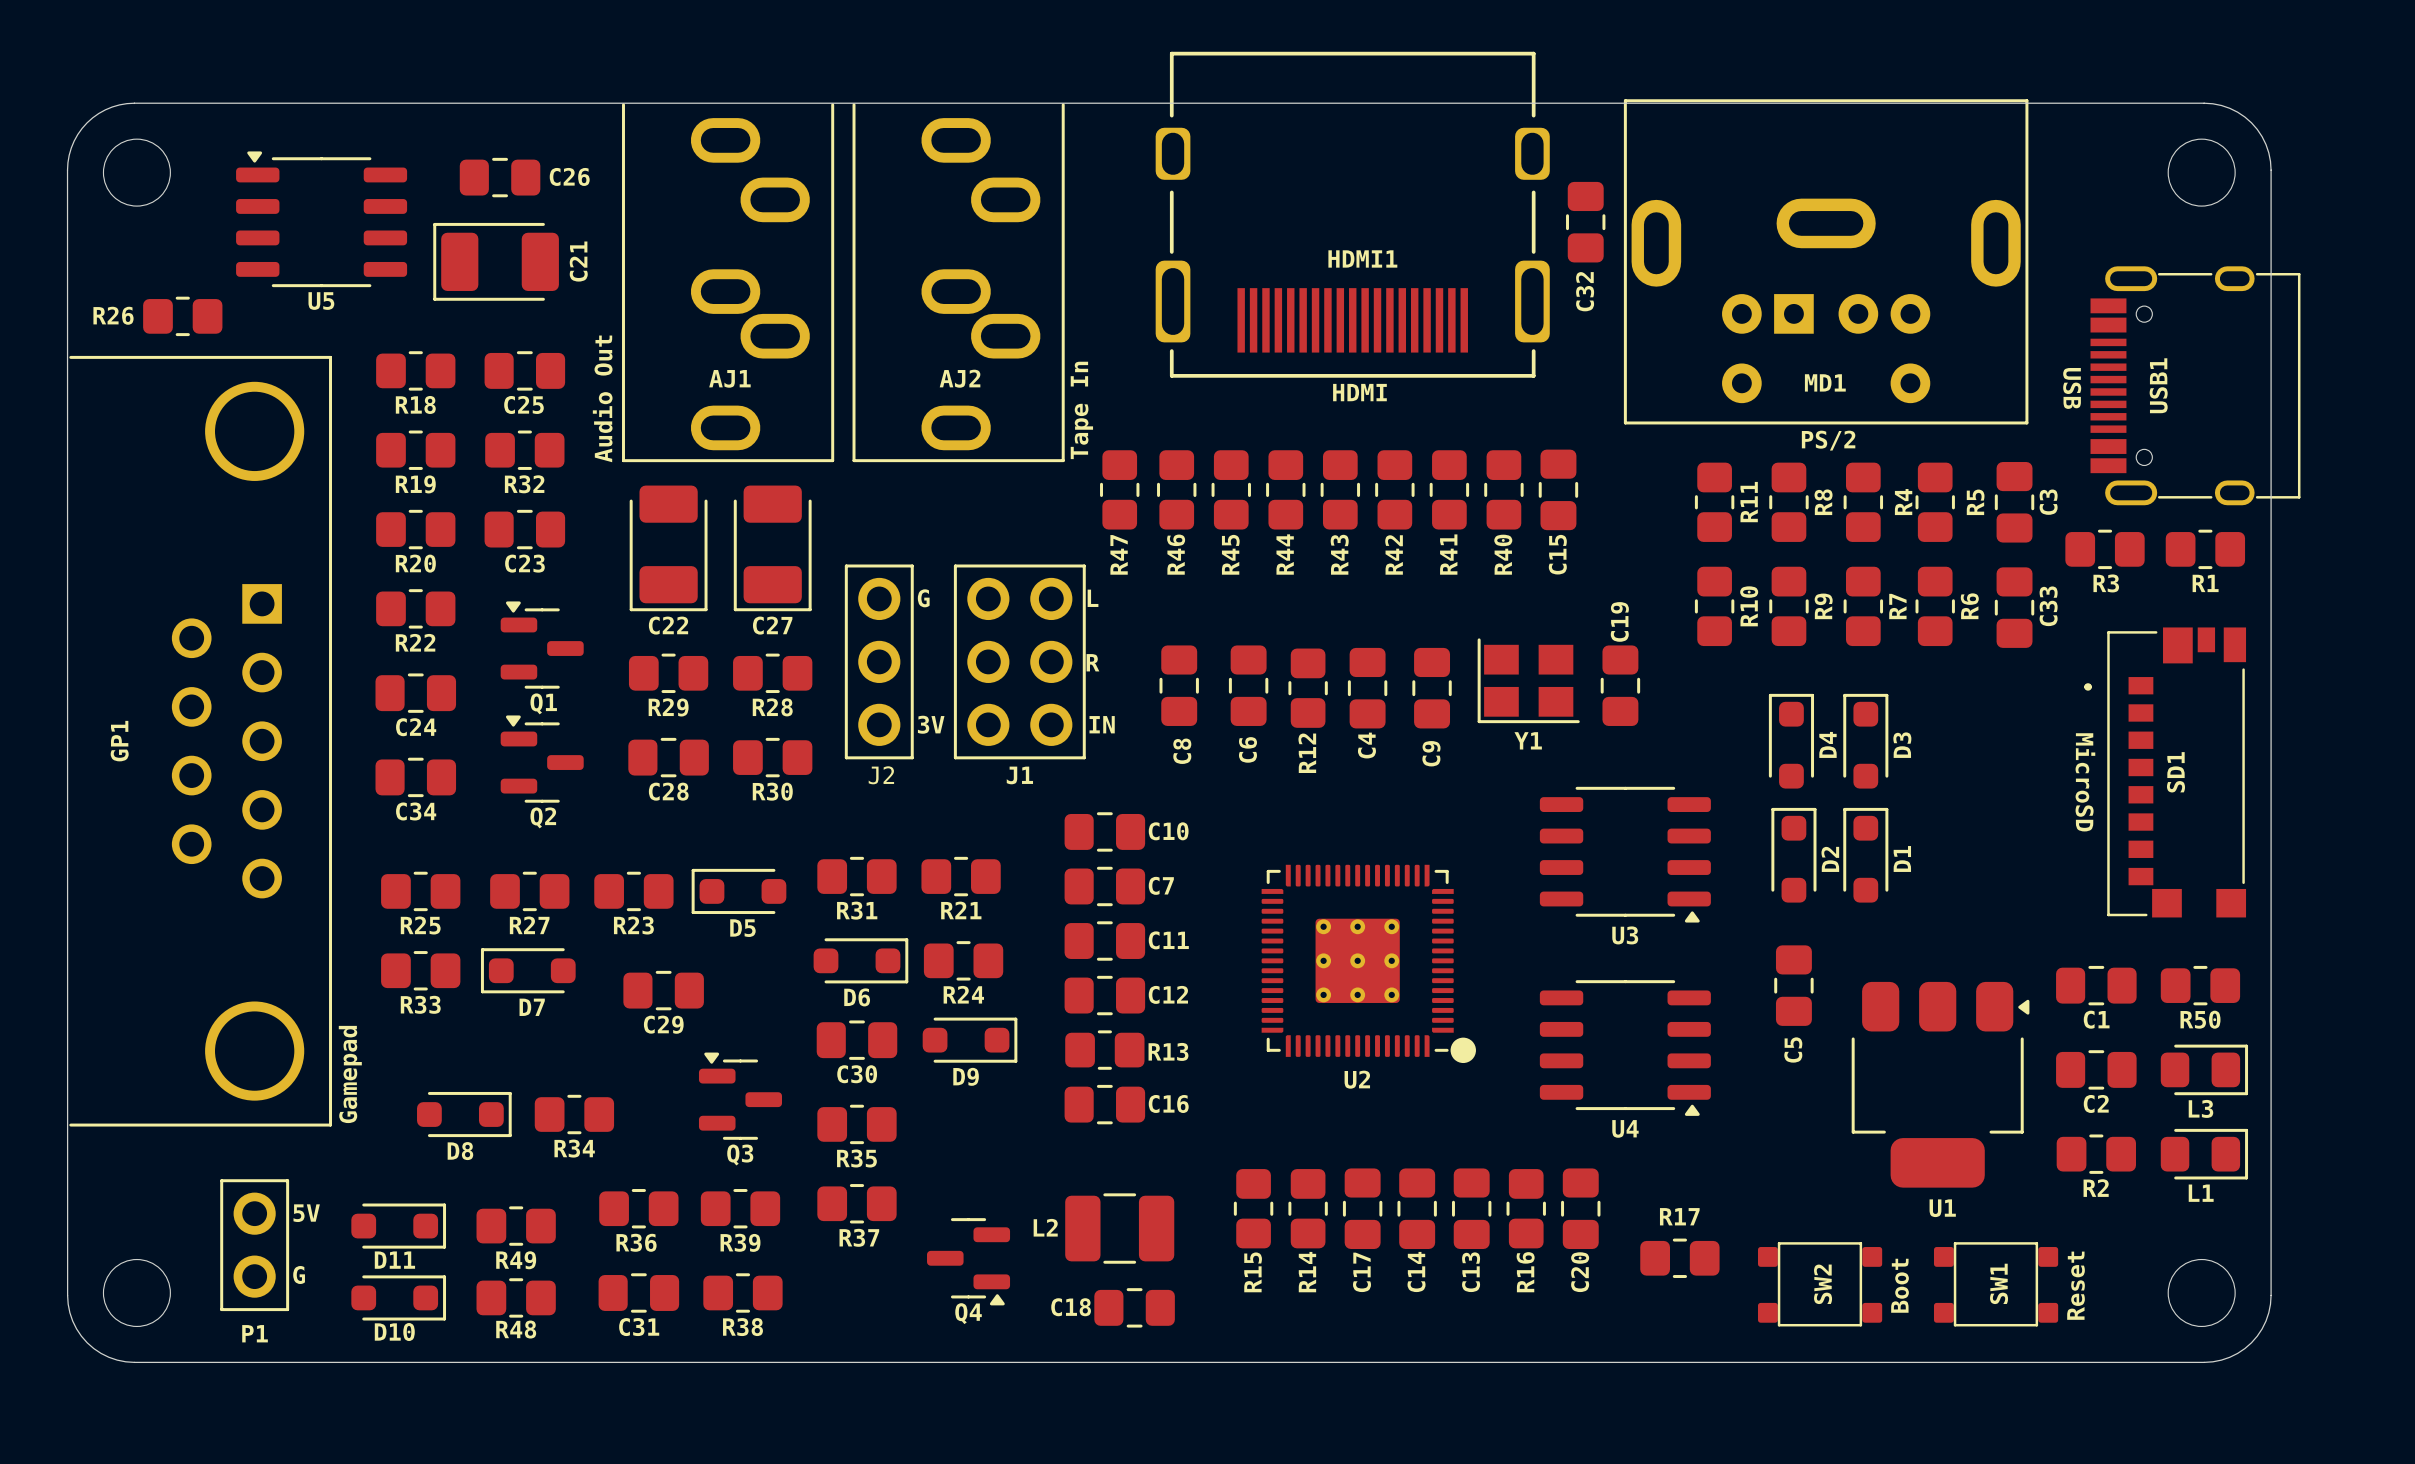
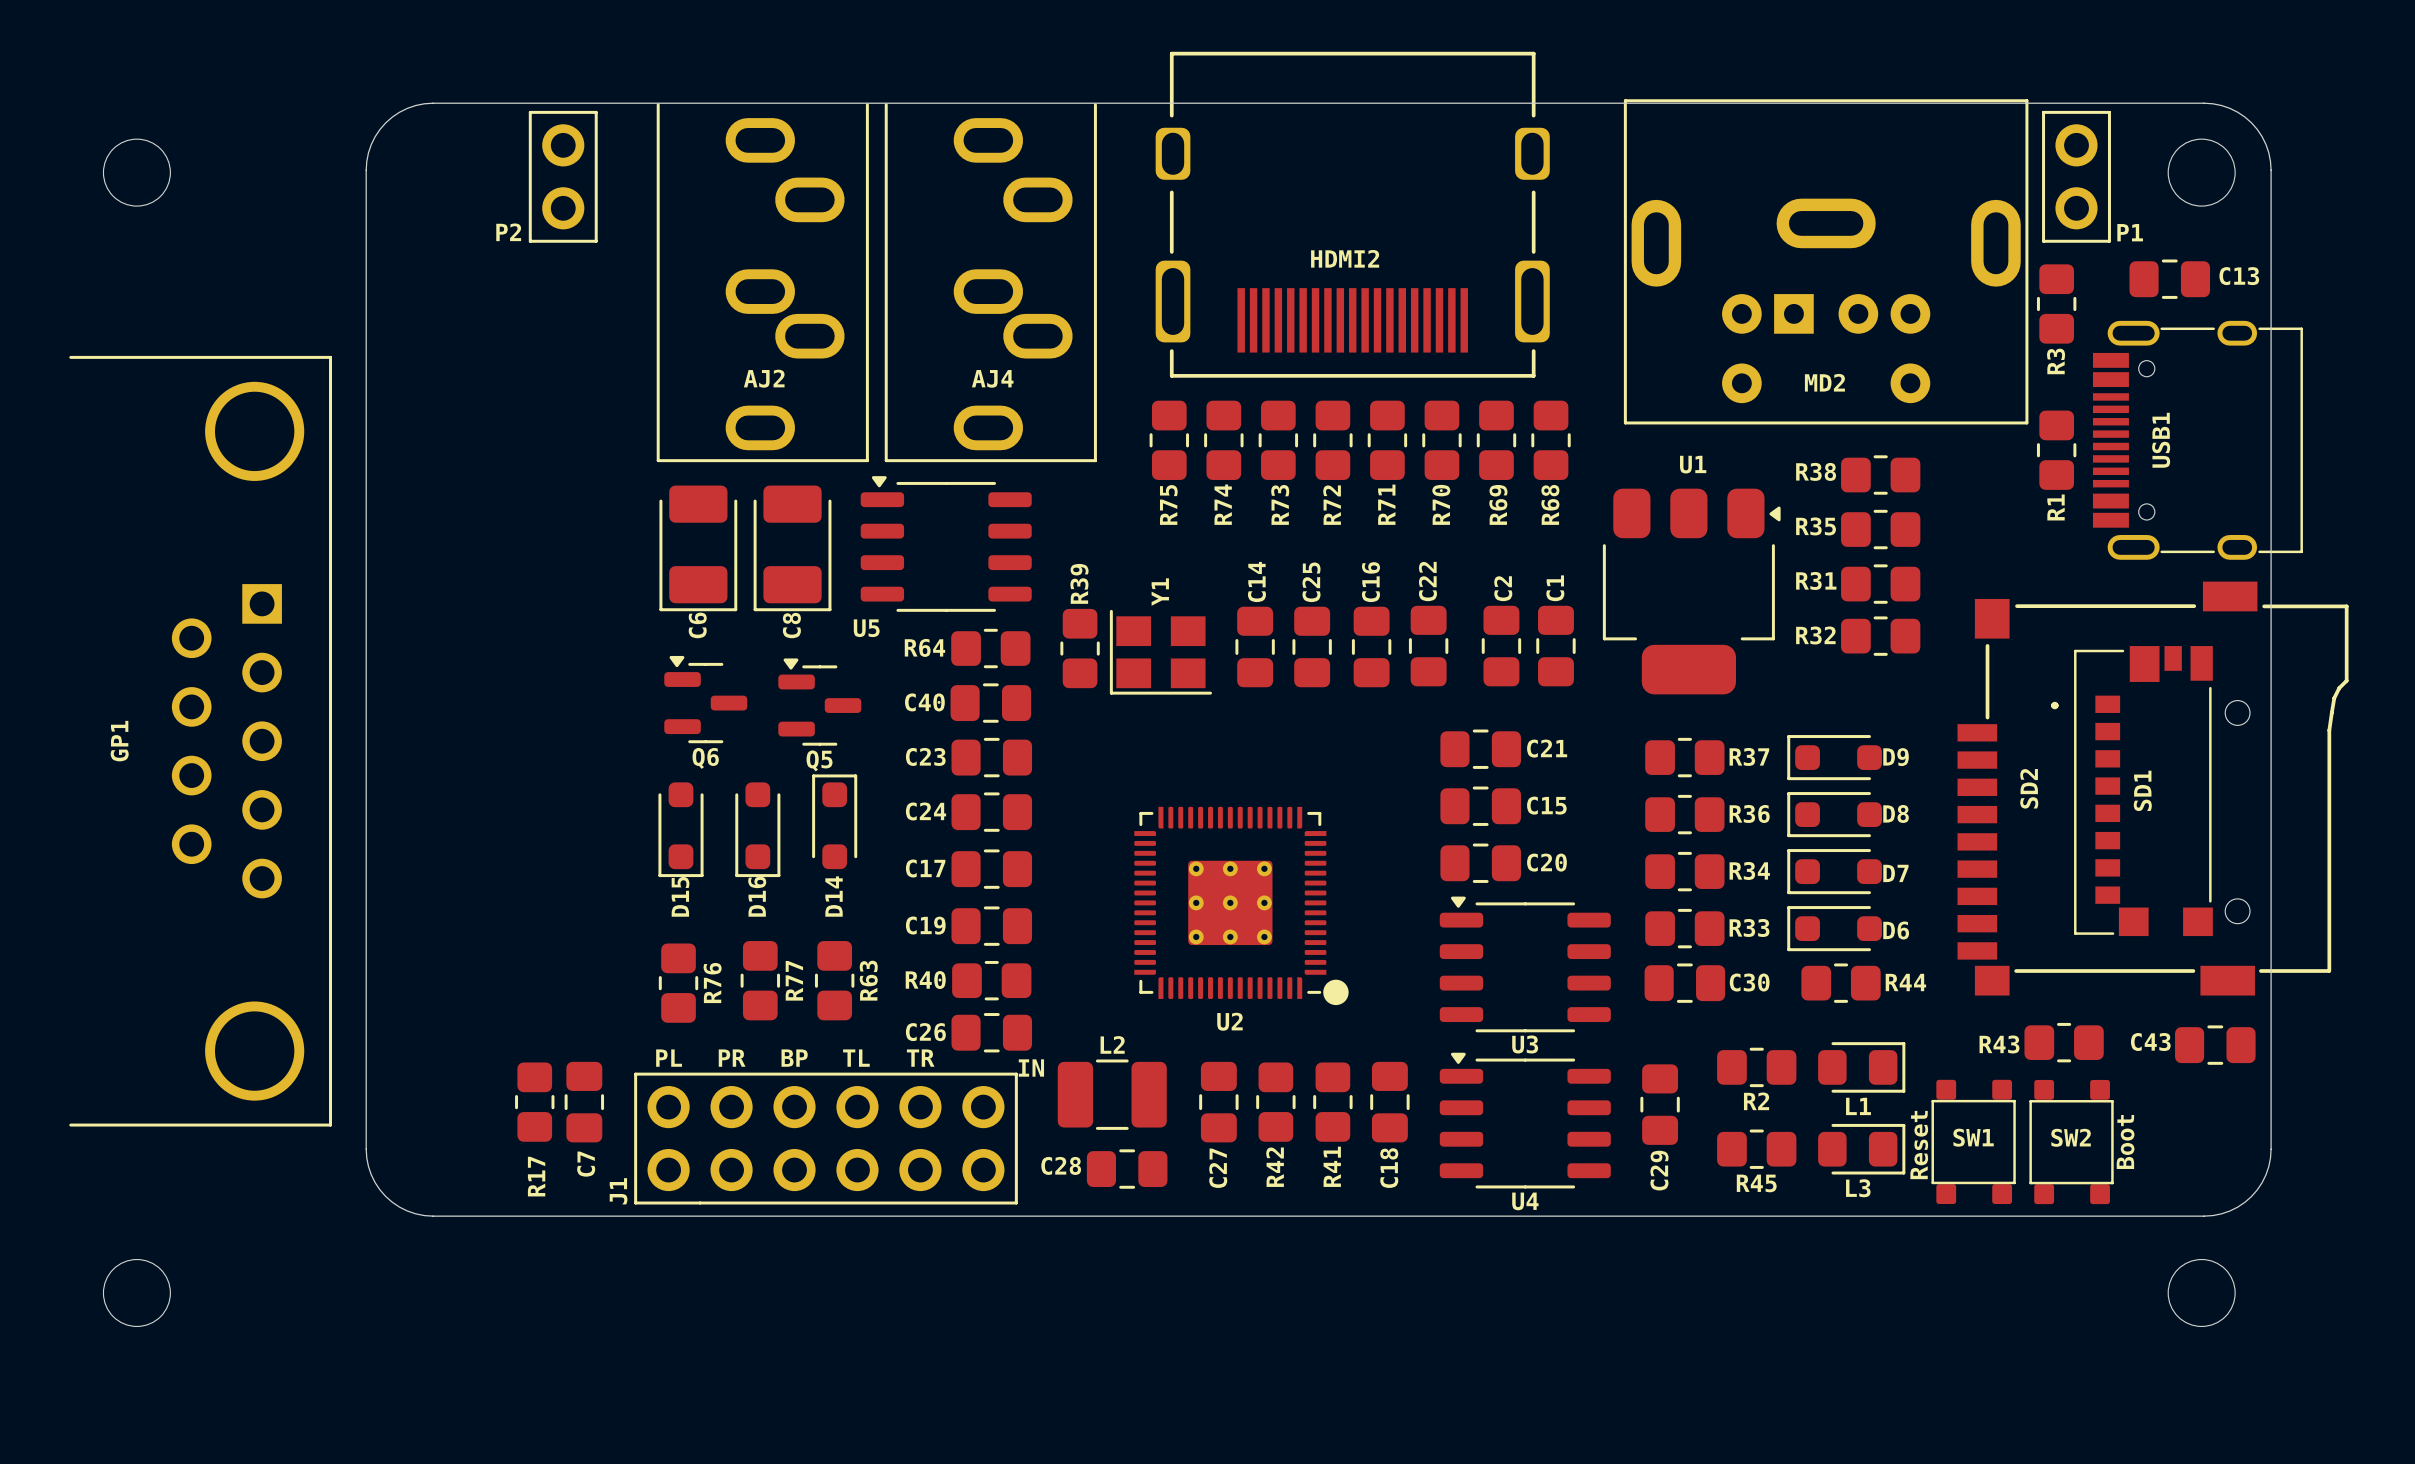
board edge: (433, 103) (126, 103) (105, 109) (87, 122) (74, 141) (69, 155) (67, 170) (67, 1295) (69, 1312) (76, 1328) (87, 1342) (101, 1353) (117, 1360) (134, 1362) (2212, 1361) (2229, 1357) (2251, 1342) (2262, 1328) (2268, 1312) (2271, 1295) (2271, 1149) -> (433, 103) (407, 108) (385, 122) (371, 144) (366, 170) (366, 1149) (368, 1166) (375, 1182) (385, 1196) (399, 1207) (415, 1213) (433, 1216) (2204, 1216) (2229, 1211) (2251, 1196) (2265, 1174) (2271, 1149)
P2: none -> (563, 176)
C26 name position: C26 (569, 176) -> C26 (925, 1032)
C26 position: (500, 177) -> (991, 1032)
U5 position: (321, 219) -> (946, 543)
C21 footprint: [433, 222, 559, 301] -> [1440, 729, 1521, 769]
C32: (1585, 222) -> none
HDMI1 name: HDMI1 (1362, 258) -> HDMI2 (1345, 258)
AJ1: (728, 282) -> none
AJ2 position: (958, 282) -> (762, 282)
AJ4: none -> (990, 282)
U5 name position: U5 (321, 301) -> U5 (866, 628)
R26: (182, 316) -> none
R18: (415, 370) -> none
C25 rotation: 0° (524, 370) -> 90° clockwise (1312, 646)
C25 position: (524, 370) -> (1312, 646)
MD1 name: MD1 (1825, 382) -> MD2 (1824, 382)
USB1 position: (2195, 385) -> (2197, 440)
text: USB (2072, 388) -> none
text: HDMI (1359, 392) -> none
text: Audio Out (602, 398) -> none
C25 name position: C25 (523, 404) -> C25 (1311, 582)
text: Tape In (1081, 410) -> none
R75: none -> (1169, 440)
R74: none -> (1223, 440)
R73: none -> (1278, 440)
R72: none -> (1332, 440)
R71: none -> (1387, 440)
R70: none -> (1441, 440)
R69: none -> (1496, 440)
R68: none -> (1551, 440)
text: PS/2 (1828, 440) -> none
R19: (415, 450) -> none
R32 position: (524, 450) -> (1880, 636)
R32 name position: R32 (524, 484) -> R32 (1815, 635)
C22 footprint: [629, 485, 708, 612] -> [1408, 605, 1449, 687]
C27 footprint: [733, 485, 812, 612] -> [1199, 1061, 1239, 1143]
R47: (1119, 489) -> none
R46: (1176, 489) -> none
R45 rotation: 0° (1231, 489) -> 90° clockwise (1756, 1149)
R45 position: (1231, 489) -> (1756, 1149)
R44 rotation: 0° (1285, 489) -> 90° clockwise (1841, 983)
R44 position: (1285, 489) -> (1841, 983)
R43 rotation: 0° (1340, 489) -> 90° clockwise (2064, 1042)
R43 position: (1340, 489) -> (2064, 1042)
R42 position: (1394, 489) -> (1275, 1102)
R41 position: (1449, 489) -> (1332, 1102)
R40 rotation: 0° (1503, 489) -> 90° clockwise (991, 980)
R40 position: (1503, 489) -> (991, 980)
C15 rotation: 0° (1558, 489) -> 90° clockwise (1480, 806)
C15 position: (1558, 489) -> (1480, 806)
R11: (1714, 502) -> none
R8: (1788, 502) -> none
R4: (1863, 502) -> none
R5: (1935, 502) -> none
C3: (2014, 502) -> none
R20: (415, 529) -> none
C23 position: (524, 529) -> (991, 757)
R3 rotation: 0° (2105, 549) -> 90° clockwise (2056, 303)
R3 position: (2105, 549) -> (2056, 303)
R1 rotation: 0° (2205, 549) -> 90° clockwise (2056, 450)
R1 position: (2205, 549) -> (2056, 450)
R44 name position: R44 (1285, 554) -> R44 (1905, 982)
C15 name position: C15 (1557, 554) -> C15 (1546, 805)
C23 name position: C23 (524, 563) -> C23 (925, 756)
J1 footprint: [953, 564, 1086, 760] -> [634, 1072, 1018, 1205]
text: G (923, 598) -> none
text: L (1093, 598) -> none
R10: (1714, 606) -> none
R9: (1788, 606) -> none
R7: (1863, 606) -> none
R6: (1935, 606) -> none
C33: (2014, 607) -> none
R22: (415, 608) -> none
C19 name position: C19 (1619, 621) -> C19 (925, 925)
C22 name position: C22 (668, 625) -> C22 (1428, 581)
Q1: (542, 645) -> none
C8 footprint: [1159, 645, 1199, 726] -> [753, 485, 832, 612]
C6 footprint: [1228, 645, 1269, 726] -> [659, 485, 738, 612]
R64: none -> (990, 648)
J2: (879, 661) -> none
text: R (1092, 662) -> none
R29: (668, 673) -> none
R28: (772, 673) -> none
Y1 position: (1528, 680) -> (1160, 652)
C19 rotation: 0° (1620, 685) -> 90° clockwise (991, 926)
C19 position: (1620, 685) -> (991, 926)
R12: (1308, 688) -> none
C4: (1367, 688) -> none
C9: (1432, 688) -> none
C24 position: (415, 693) -> (991, 812)
Q6: none -> (705, 699)
Q5: none -> (819, 702)
C40: none -> (990, 703)
text: 3V (931, 724) -> none
text position: IN (1102, 724) -> IN (1031, 1068)
C24 name position: C24 (416, 727) -> C24 (926, 811)
Y1 name rotation: 0° (1528, 740) -> 90° counterclockwise (1160, 592)
Y1 name position: Y1 (1528, 740) -> Y1 (1160, 592)
D4: (1791, 741) -> none
D3: (1865, 741) -> none
C28 position: (668, 757) -> (1127, 1169)
R30: (772, 757) -> none
Q2: (542, 759) -> none
SD1 position: (2165, 772) -> (2131, 791)
J1 name position: J1 (1019, 775) -> J1 (618, 1191)
C34: (415, 777) -> none
text: MicroSD (2085, 782) -> none
SD2: none -> (2153, 788)
C28 name position: C28 (668, 791) -> C28 (1061, 1165)
D14: none -> (834, 821)
D15: none -> (680, 829)
D16: none -> (757, 829)
C10: (1104, 831) -> none
U3 rotation: 0° (1625, 854) -> 180° (1525, 964)
U3 position: (1625, 854) -> (1525, 964)
D2: (1793, 855) -> none
D1: (1865, 855) -> none
R31 position: (856, 876) -> (1880, 584)
R21: (961, 876) -> none
C7 rotation: 0° (1104, 886) -> 90° clockwise (584, 1102)
C7 position: (1104, 886) -> (584, 1102)
R25: (420, 891) -> none
R27: (529, 891) -> none
R23: (633, 891) -> none
D5: (739, 891) -> none
R31 name position: R31 (857, 910) -> R31 (1816, 580)
C11: (1104, 941) -> none
D6 rotation: 0° (860, 960) -> 180° (1834, 928)
D6 position: (860, 960) -> (1834, 928)
R24: (963, 960) -> none
U2 position: (1368, 963) -> (1241, 905)
R33 position: (420, 970) -> (1684, 928)
D7 position: (528, 970) -> (1834, 871)
R77: none -> (760, 980)
R63: none -> (834, 980)
R76: none -> (678, 983)
C5: (1793, 985) -> none
C1 rotation: 0° (2096, 985) -> 90° clockwise (1555, 646)
C1 position: (2096, 985) -> (1555, 646)
R50: (2200, 985) -> none
C29 rotation: 0° (663, 990) -> 90° clockwise (1660, 1104)
C29 position: (663, 990) -> (1660, 1104)
C12: (1104, 995) -> none
D6 name position: D6 (857, 997) -> D6 (1896, 930)
R33 name position: R33 (420, 1004) -> R33 (1749, 927)
D7 name position: D7 (532, 1007) -> D7 (1895, 873)
C1 name position: C1 (2096, 1019) -> C1 (1555, 588)
C30 position: (856, 1040) -> (1684, 983)
D9 rotation: 0° (970, 1040) -> 180° (1834, 757)
D9 position: (970, 1040) -> (1834, 757)
C43: none -> (2215, 1045)
U4 rotation: 0° (1625, 1048) -> 180° (1525, 1120)
U4 position: (1625, 1048) -> (1525, 1120)
R13: (1104, 1050) -> none
text: none -> PL (669, 1058)
text: none -> PR (732, 1058)
text: none -> BP (794, 1058)
text: none -> TL (856, 1058)
text: none -> TR (920, 1058)
C2 rotation: 0° (2096, 1069) -> 90° clockwise (1501, 646)
C2 position: (2096, 1069) -> (1501, 646)
L3 position: (2204, 1069) -> (1861, 1149)
text: Gamepad (350, 1074) -> none
C30 name position: C30 (857, 1074) -> C30 (1749, 982)
D9 name position: D9 (966, 1076) -> D9 (1896, 757)
U1 position: (1940, 1084) -> (1691, 591)
Q3: (740, 1096) -> none
C16 name position: C16 (1168, 1103) -> C16 (1371, 582)
C2 name position: C2 (2096, 1103) -> C2 (1503, 588)
C16 rotation: 0° (1104, 1104) -> 90° clockwise (1371, 646)
C16 position: (1104, 1104) -> (1371, 646)
D8 rotation: 0° (464, 1114) -> 180° (1834, 814)
D8 position: (464, 1114) -> (1834, 814)
R34 position: (574, 1114) -> (1684, 871)
R35 position: (856, 1124) -> (1880, 529)
R34 name position: R34 (574, 1148) -> R34 (1749, 870)
D8 name position: D8 (460, 1151) -> D8 (1896, 813)
R2 position: (2096, 1154) -> (1756, 1067)
L1 position: (2204, 1154) -> (1861, 1067)
R35 name position: R35 (856, 1158) -> R35 (1816, 526)
R37 position: (856, 1203) -> (1684, 757)
R36 position: (638, 1208) -> (1684, 814)
R39 rotation: 0° (740, 1208) -> 90° clockwise (1080, 648)
R39 position: (740, 1208) -> (1080, 648)
R15: (1253, 1208) -> none
R14: (1308, 1208) -> none
C17 rotation: 0° (1362, 1208) -> 90° clockwise (991, 869)
C17 position: (1362, 1208) -> (991, 869)
C14 position: (1417, 1208) -> (1255, 646)
C13 rotation: 0° (1471, 1208) -> 90° clockwise (2169, 279)
C13 position: (1471, 1208) -> (2169, 279)
R16: (1526, 1208) -> none
C20 rotation: 0° (1580, 1208) -> 90° clockwise (1480, 863)
C20 position: (1580, 1208) -> (1480, 863)
U1 name position: U1 (1942, 1208) -> U1 (1693, 464)
text: 5V (306, 1213) -> none
R17 name position: R17 (1679, 1216) -> R17 (536, 1176)
D11: (398, 1226) -> none
R49: (516, 1226) -> none
L2 name position: L2 (1045, 1227) -> L2 (1112, 1044)
L2 position: (1119, 1228) -> (1112, 1094)
R37 name position: R37 (859, 1237) -> R37 (1749, 756)
R36 name position: R36 (636, 1242) -> R36 (1749, 813)
R39 name position: R39 (740, 1242) -> R39 (1079, 583)
P1 position: (254, 1245) -> (2076, 176)
R17 rotation: 0° (1679, 1258) -> 90° clockwise (534, 1102)
R17 position: (1679, 1258) -> (534, 1102)
Q4: (968, 1261) -> none
C14 name position: C14 (1416, 1271) -> C14 (1256, 582)
C13 name position: C13 (1471, 1272) -> C13 (2239, 276)
C20 name position: C20 (1580, 1272) -> C20 (1546, 862)
text: G (299, 1275) -> none
SW2 rotation: 0° (1820, 1284) -> 90° counterclockwise (2071, 1142)
SW2 position: (1820, 1284) -> (2071, 1142)
SW1 rotation: 0° (1996, 1284) -> 90° counterclockwise (1973, 1141)
SW1 position: (1996, 1284) -> (1973, 1141)
text position: Boot (1900, 1285) -> Boot (2125, 1141)
text position: Reset (2076, 1285) -> Reset (1919, 1145)
C31: (638, 1292) -> none
R38 position: (742, 1292) -> (1880, 475)
D10: (398, 1297) -> none
R48: (516, 1297) -> none
C18 name position: C18 (1071, 1307) -> C18 (1389, 1168)
C18 rotation: 0° (1134, 1307) -> 90° clockwise (1389, 1102)
C18 position: (1134, 1307) -> (1389, 1102)
R38 name position: R38 (742, 1327) -> R38 (1816, 471)
P1 name position: P1 (255, 1333) -> P1 (2130, 232)

